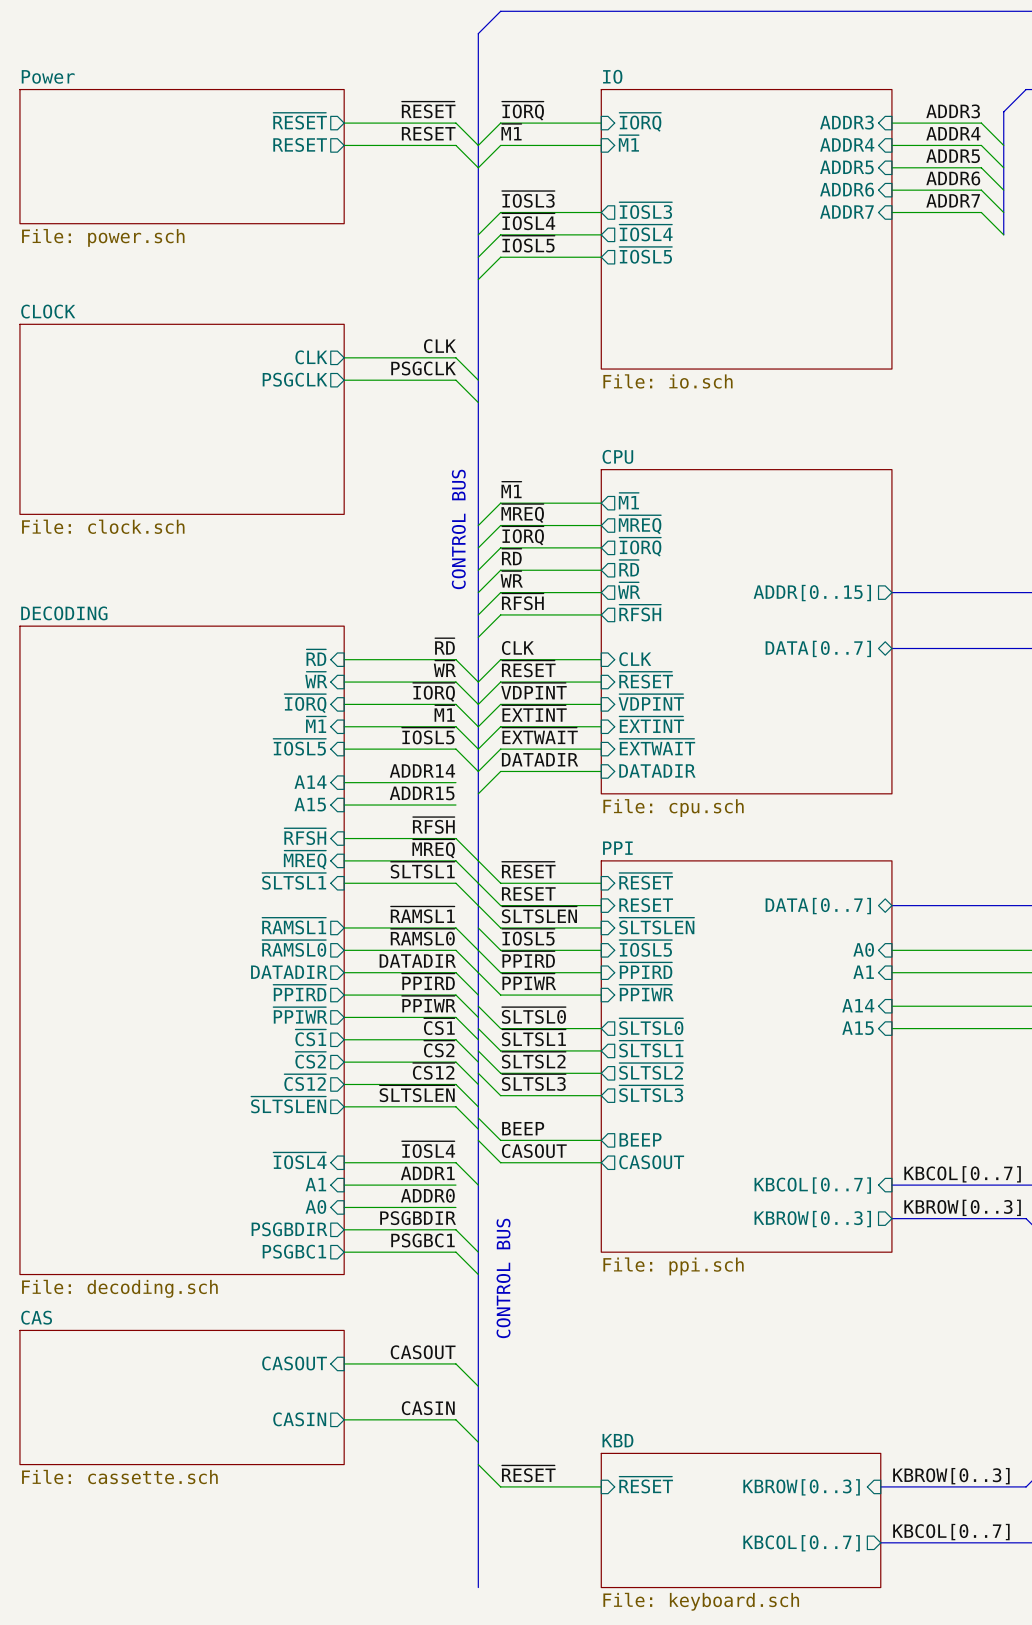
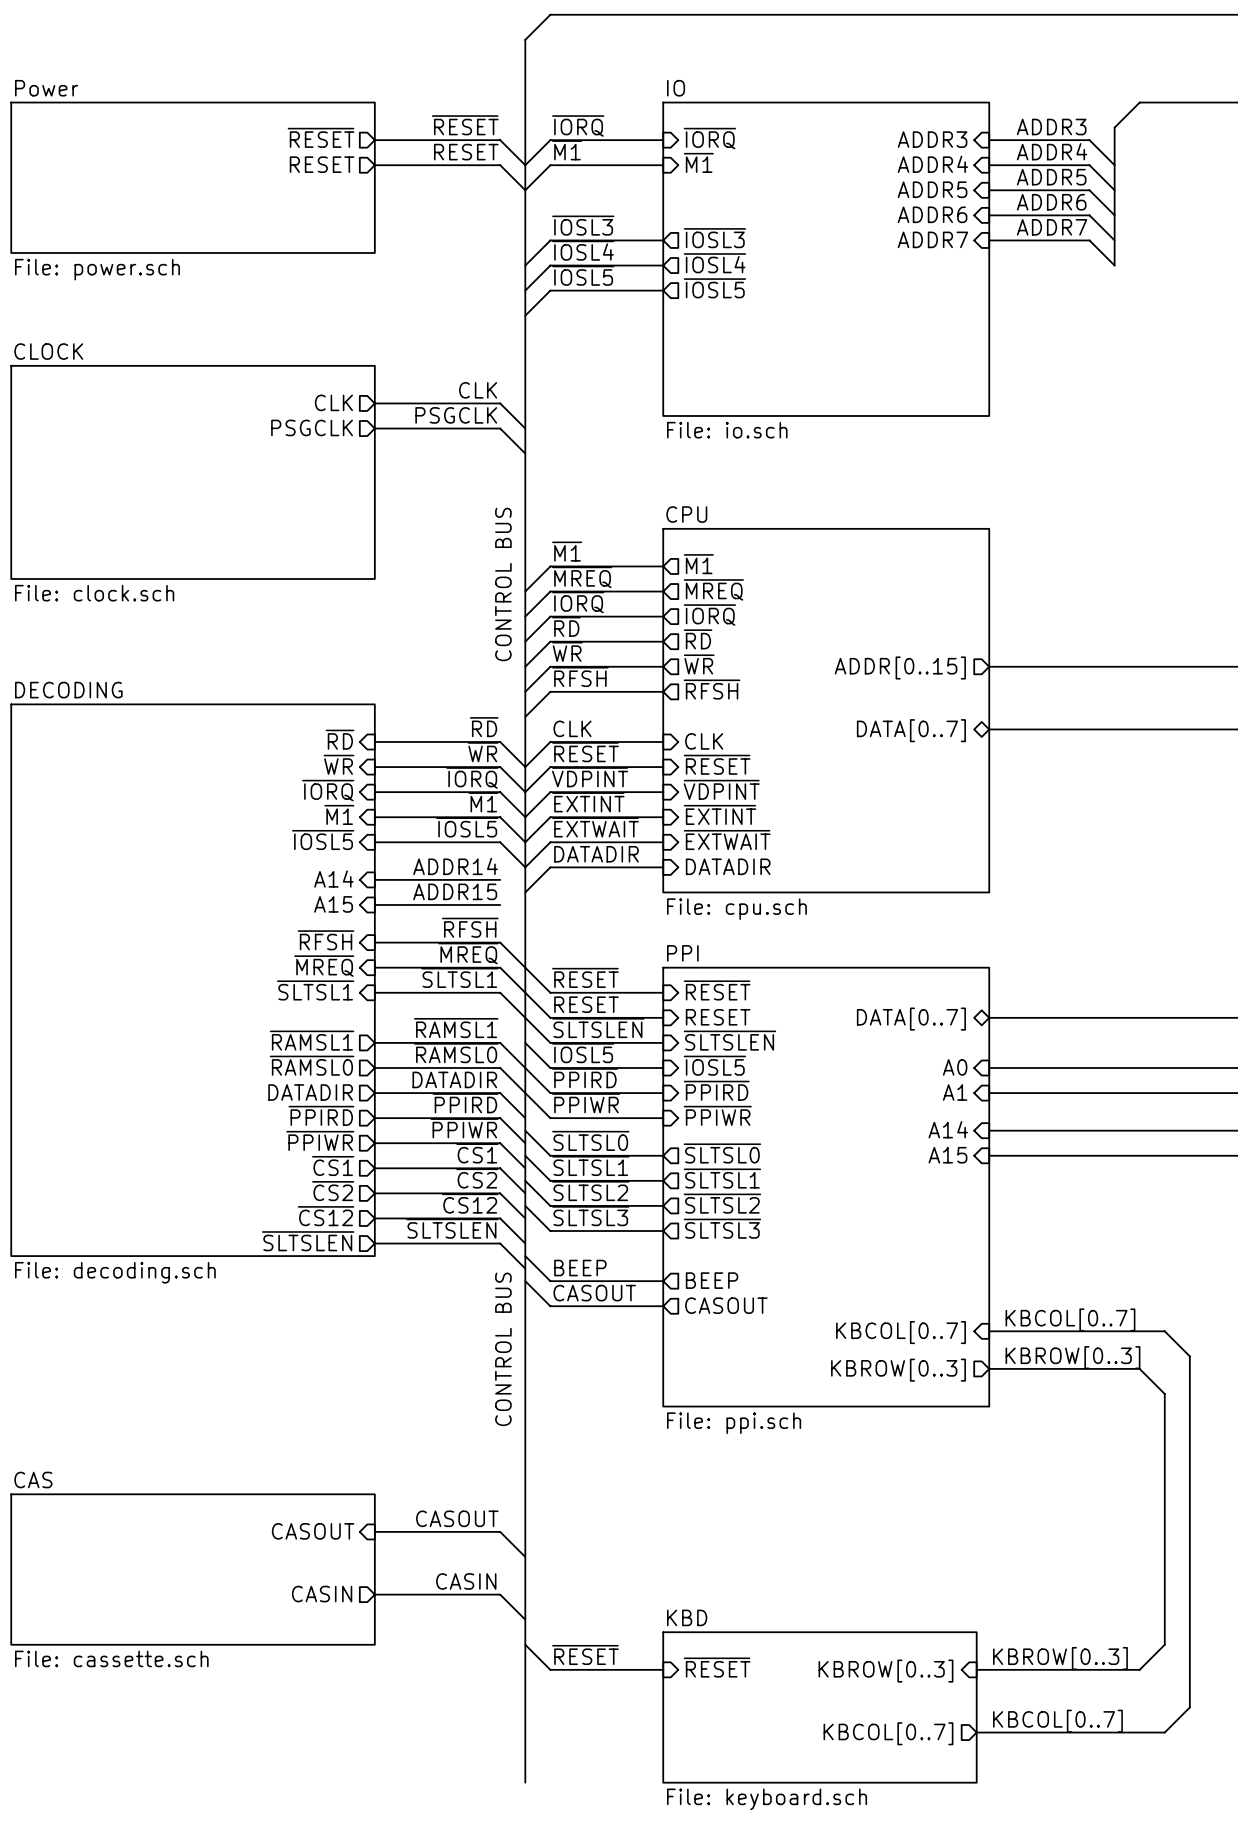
sheet DECODING: none -> File: decoding.sch (193, 980)
sheet DECODING: File: decoding.sch (182, 950) -> none
label: ~{IOSL4} (428, 1149) -> none
sheet pin: ~{IOSL4} (299, 1160) -> none
wire: (344, 1162) (455, 1162) (478, 1185) -> none
label: ADDR1 (427, 1173) -> none
sheet pin: A1 (315, 1184) -> none
wire: (344, 1185) (455, 1185) -> none
label: ADDR0 (427, 1195) -> none
sheet pin: A0 (315, 1206) -> none
wire: (344, 1207) (455, 1207) -> none
label: PSGBDIR (418, 1218) -> none
sheet pin: PSGBDIR (289, 1229) -> none
wire: (344, 1229) (455, 1229) (478, 1252) -> none
label: PSGBC1 (422, 1240) -> none
sheet pin: PSGBC1 (294, 1251) -> none
wire: (344, 1252) (455, 1252) (478, 1274) -> none
text position: CONTROL BUS (503, 1278) -> CONTROL BUS (503, 1349)

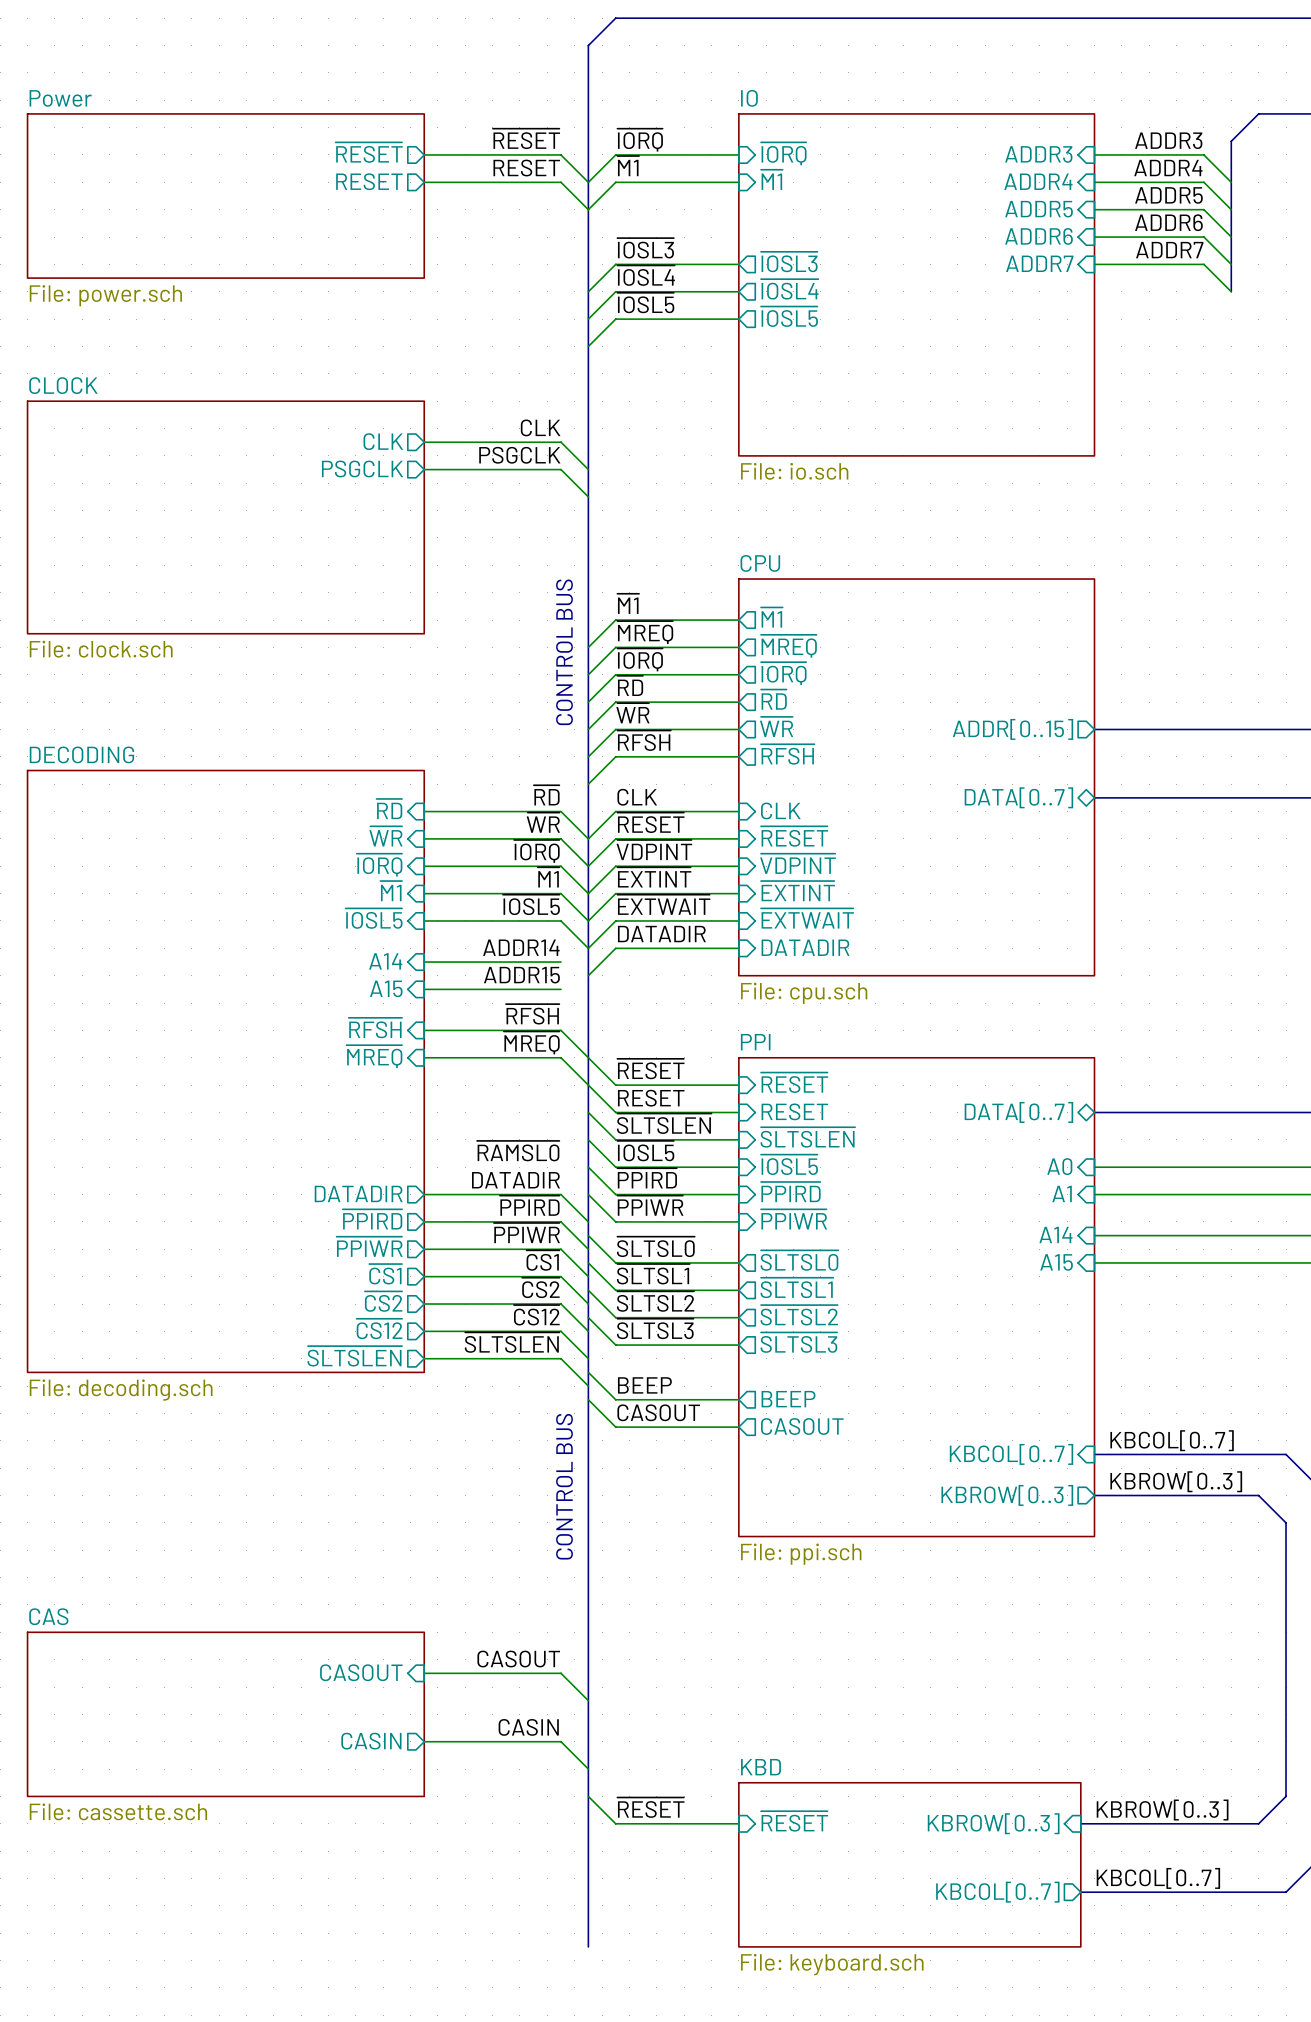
label: ~{SLTSL1} (459, 977) -> none
sheet pin: ~{SLTSL1} (315, 990) -> none
wire: (374, 992) (500, 992) (525, 1017) -> none
label: ~{RAMSL1} (456, 1028) -> none
sheet pin: ~{RAMSL1} (312, 1040) -> none
wire: (374, 1042) (500, 1042) (525, 1068) -> none
sheet pin: ~{RAMSL0} (312, 1065) -> none
wire: (374, 1068) (500, 1068) (525, 1093) -> none

